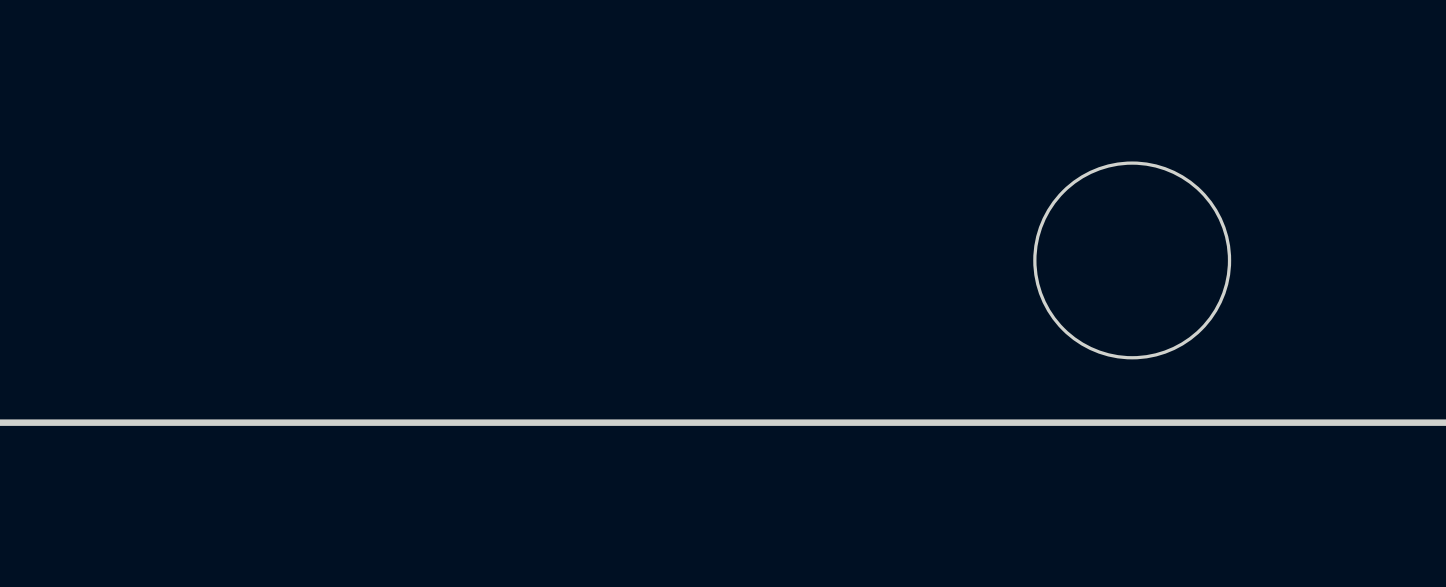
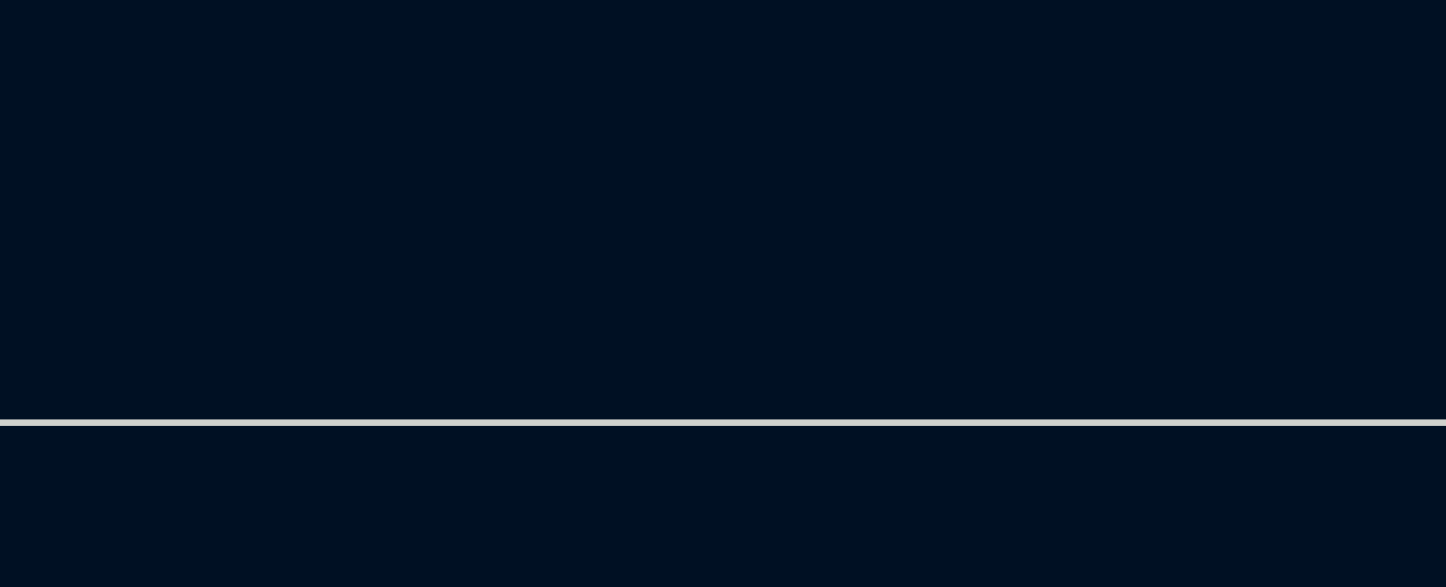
round board edge: [1033, 161, 1232, 360] -> none

